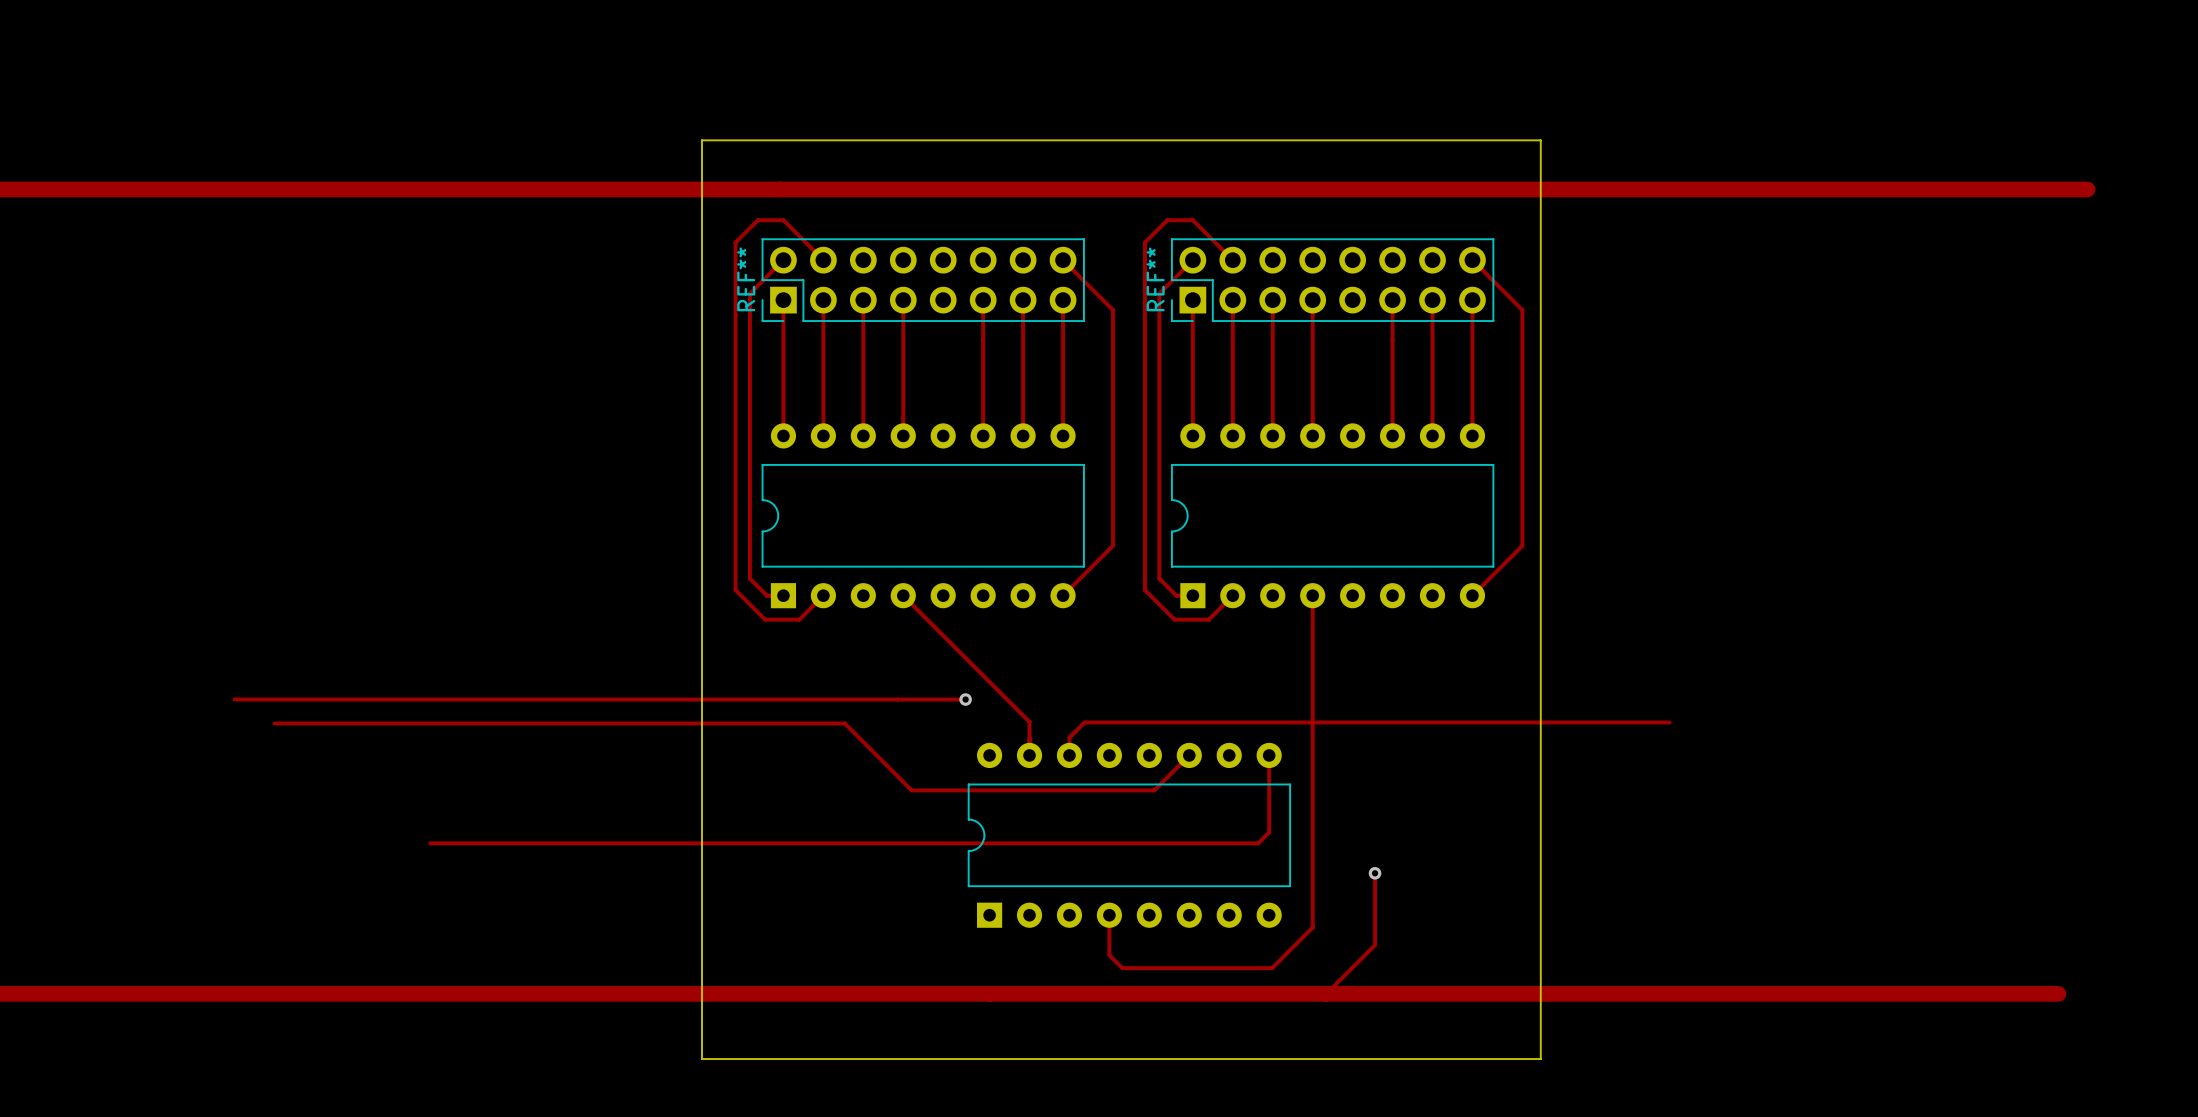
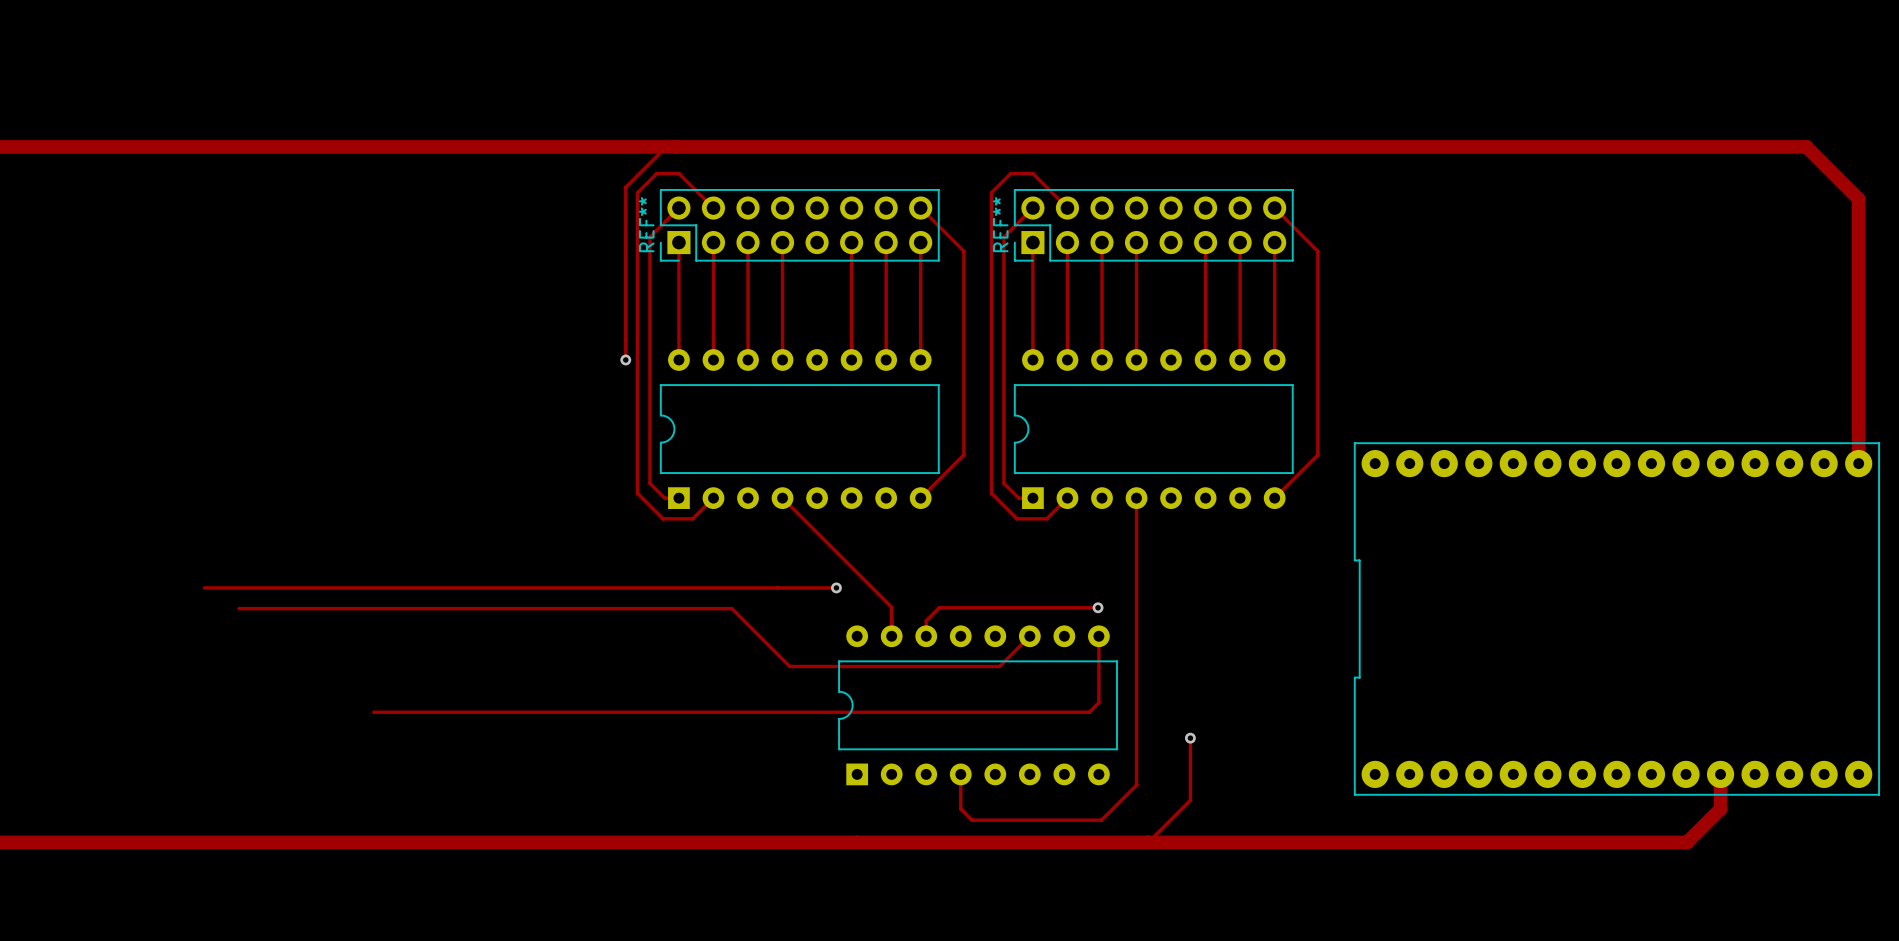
board edge: (702, 140) (1540, 140) (1540, 1059) (702, 1059) (702, 140) -> none
track: none -> (675, 146) (666, 146) (625, 187) (625, 359)
track: none -> (1806, 146) (1858, 199) (1858, 463)
via: none -> (625, 359)
track: (1268, 722) (1669, 722) -> none
via: none -> (1098, 607)
part: none -> (1616, 619)
track: (1949, 993) (2058, 993) -> (1687, 842) (1720, 808) (1720, 774)

